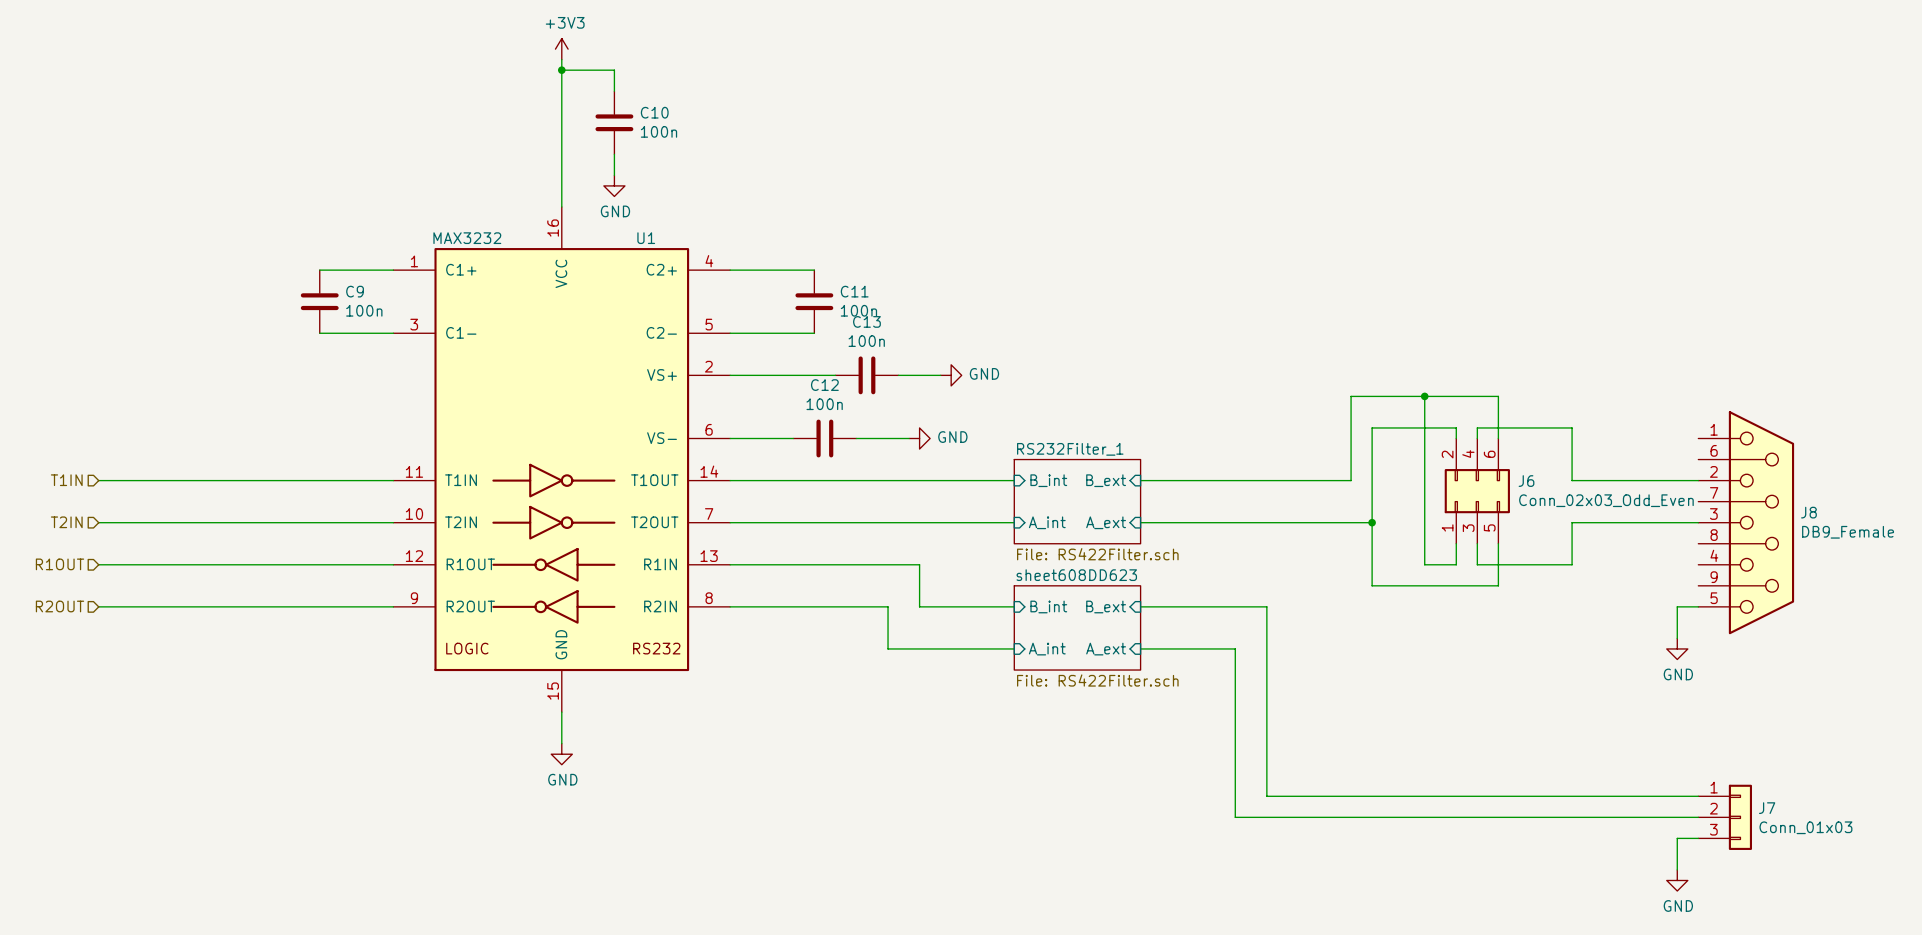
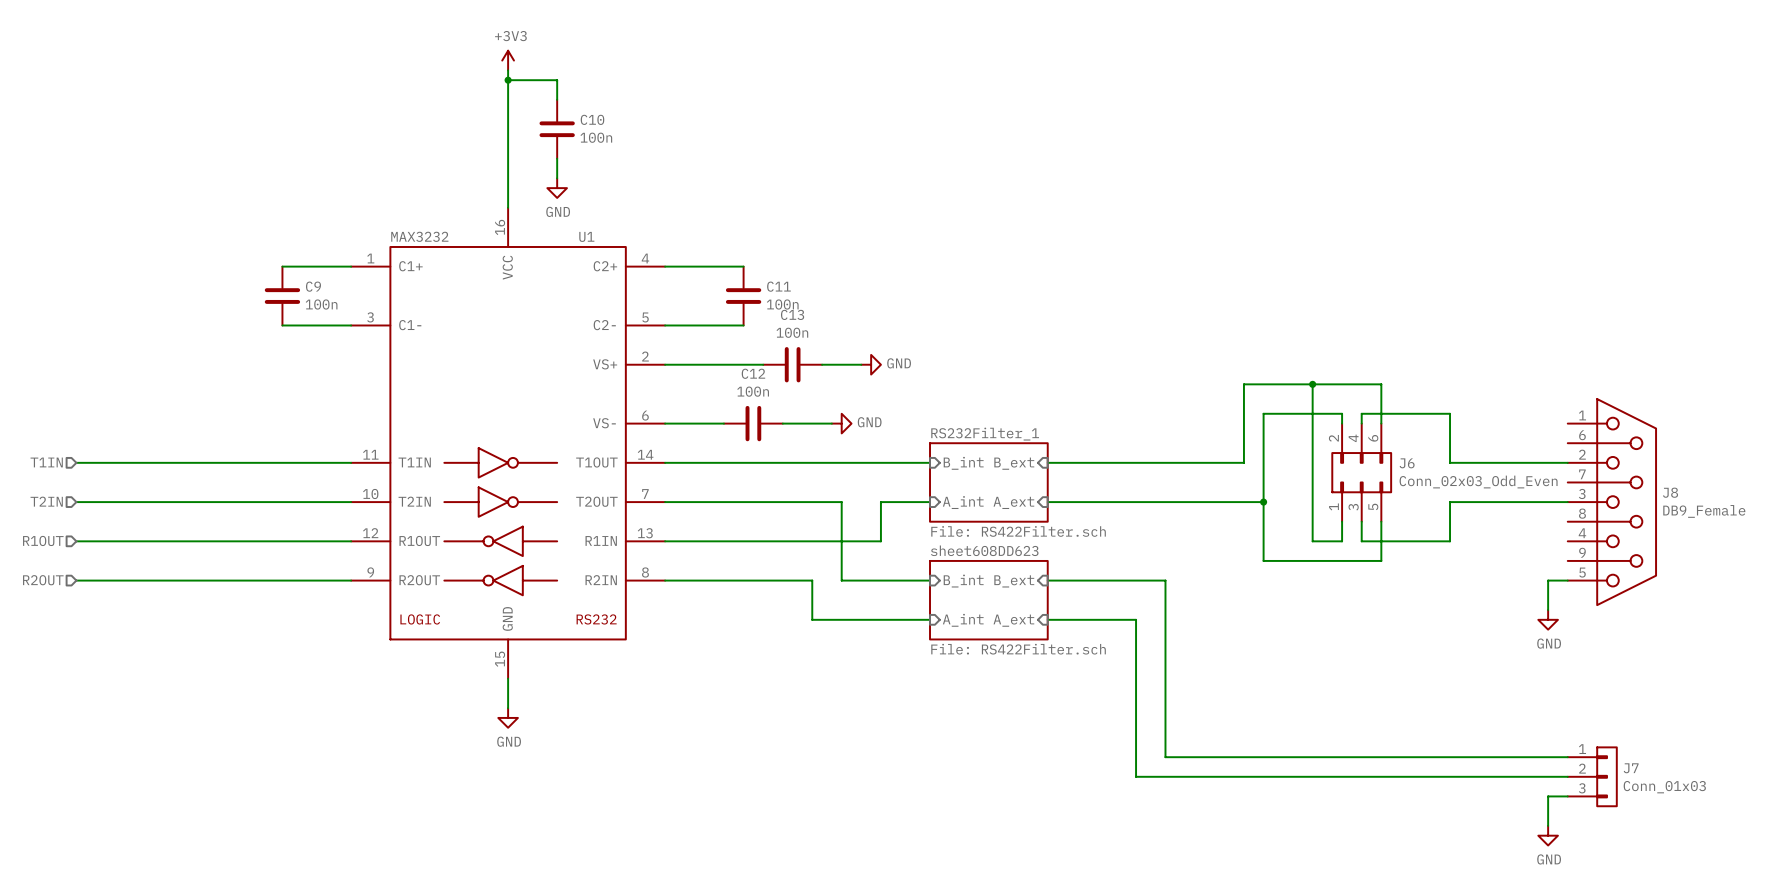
wire: (919, 522) (961, 522) -> (841, 502) (841, 541) (880, 541) (880, 502)

